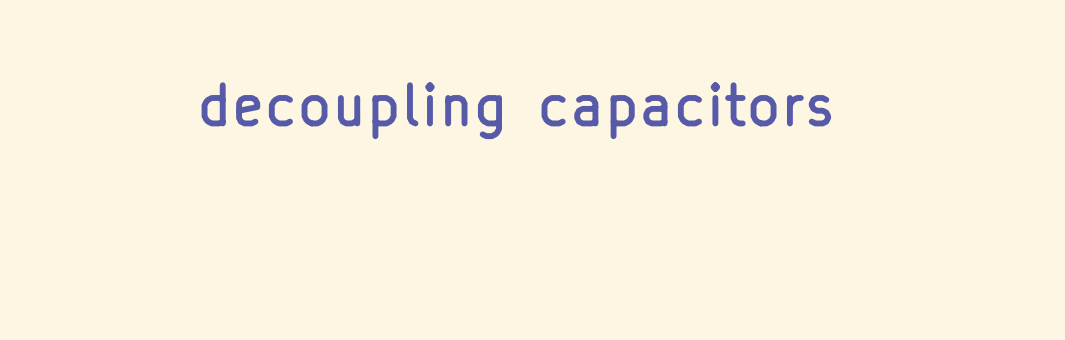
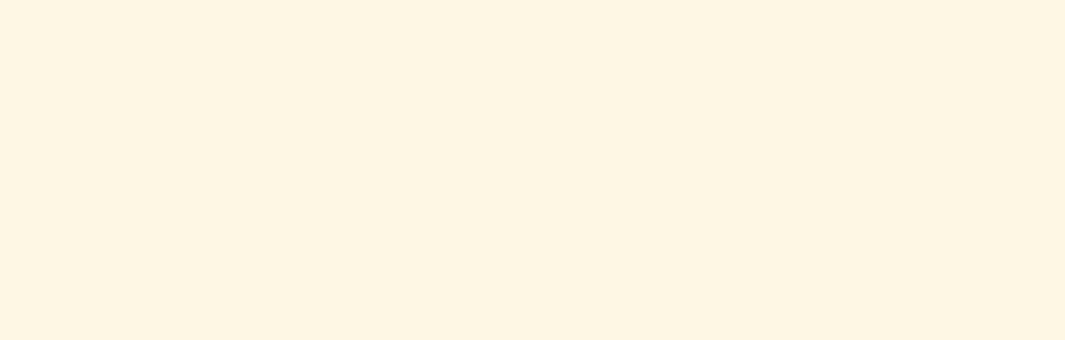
text: decoupling capacitors (516, 110) -> none

